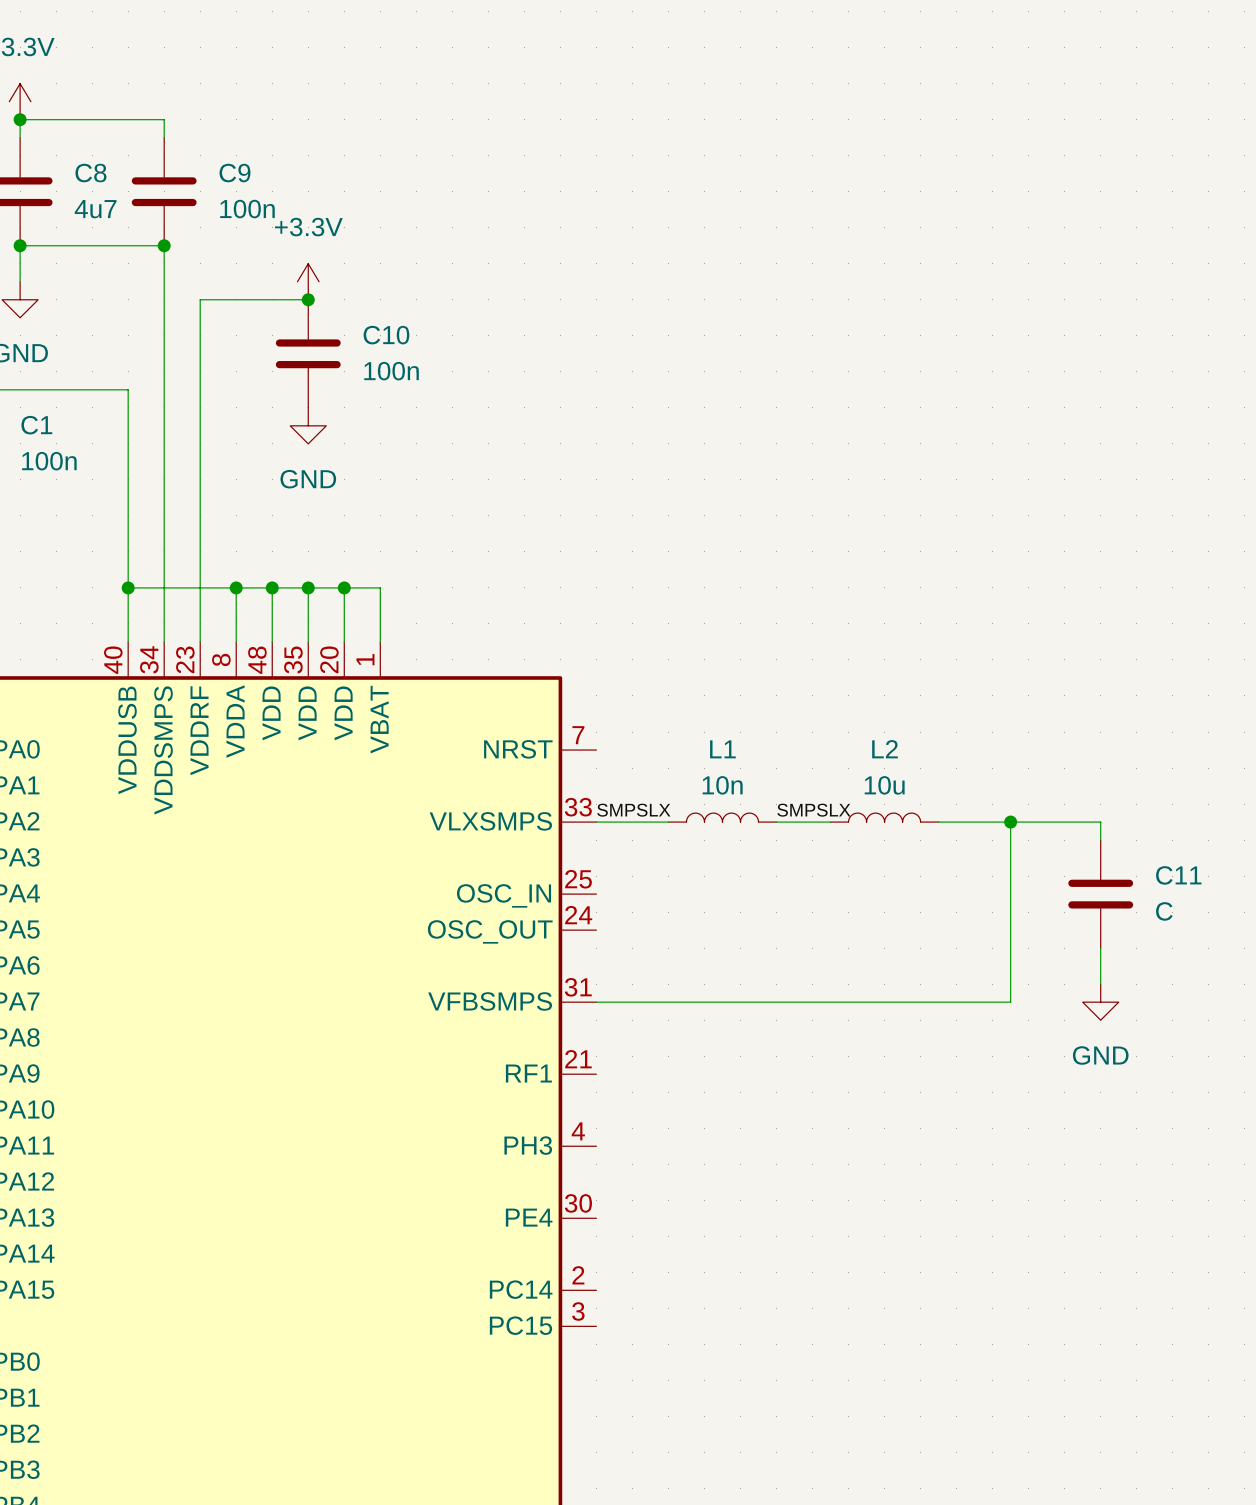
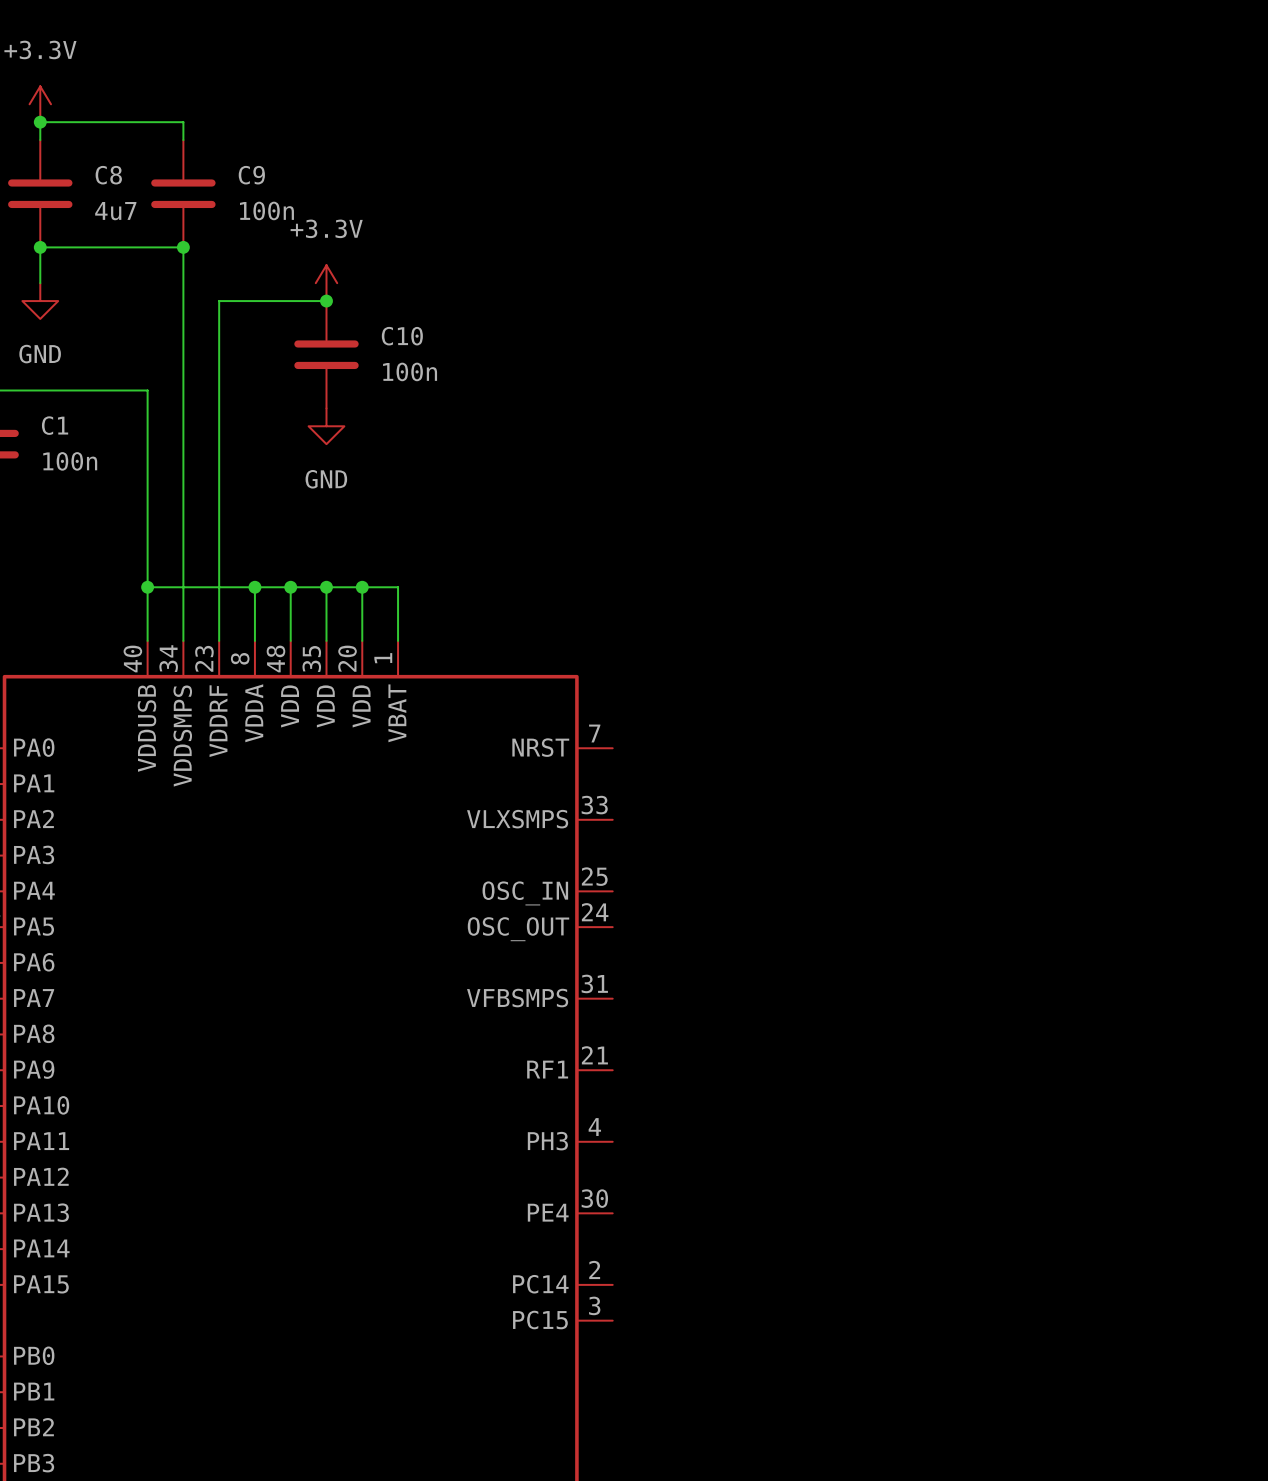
label: SMPSLX (633, 810) -> none
label: SMPSLX (813, 810) -> none
L1: 10n (722, 817) -> none
L2: 10u (884, 817) -> none
wire: (596, 822) (668, 822) -> none
wire: (776, 822) (830, 822) -> none
wire: (938, 822) (1100, 822) (1100, 840) -> none
wire: (1010, 822) (1010, 1002) (596, 1002) -> none
junction: (1010, 822) -> none
C11: C (1100, 894) -> none
wire: (1100, 948) (1100, 984) -> none
power symbol: GND (1100, 1002) -> none

